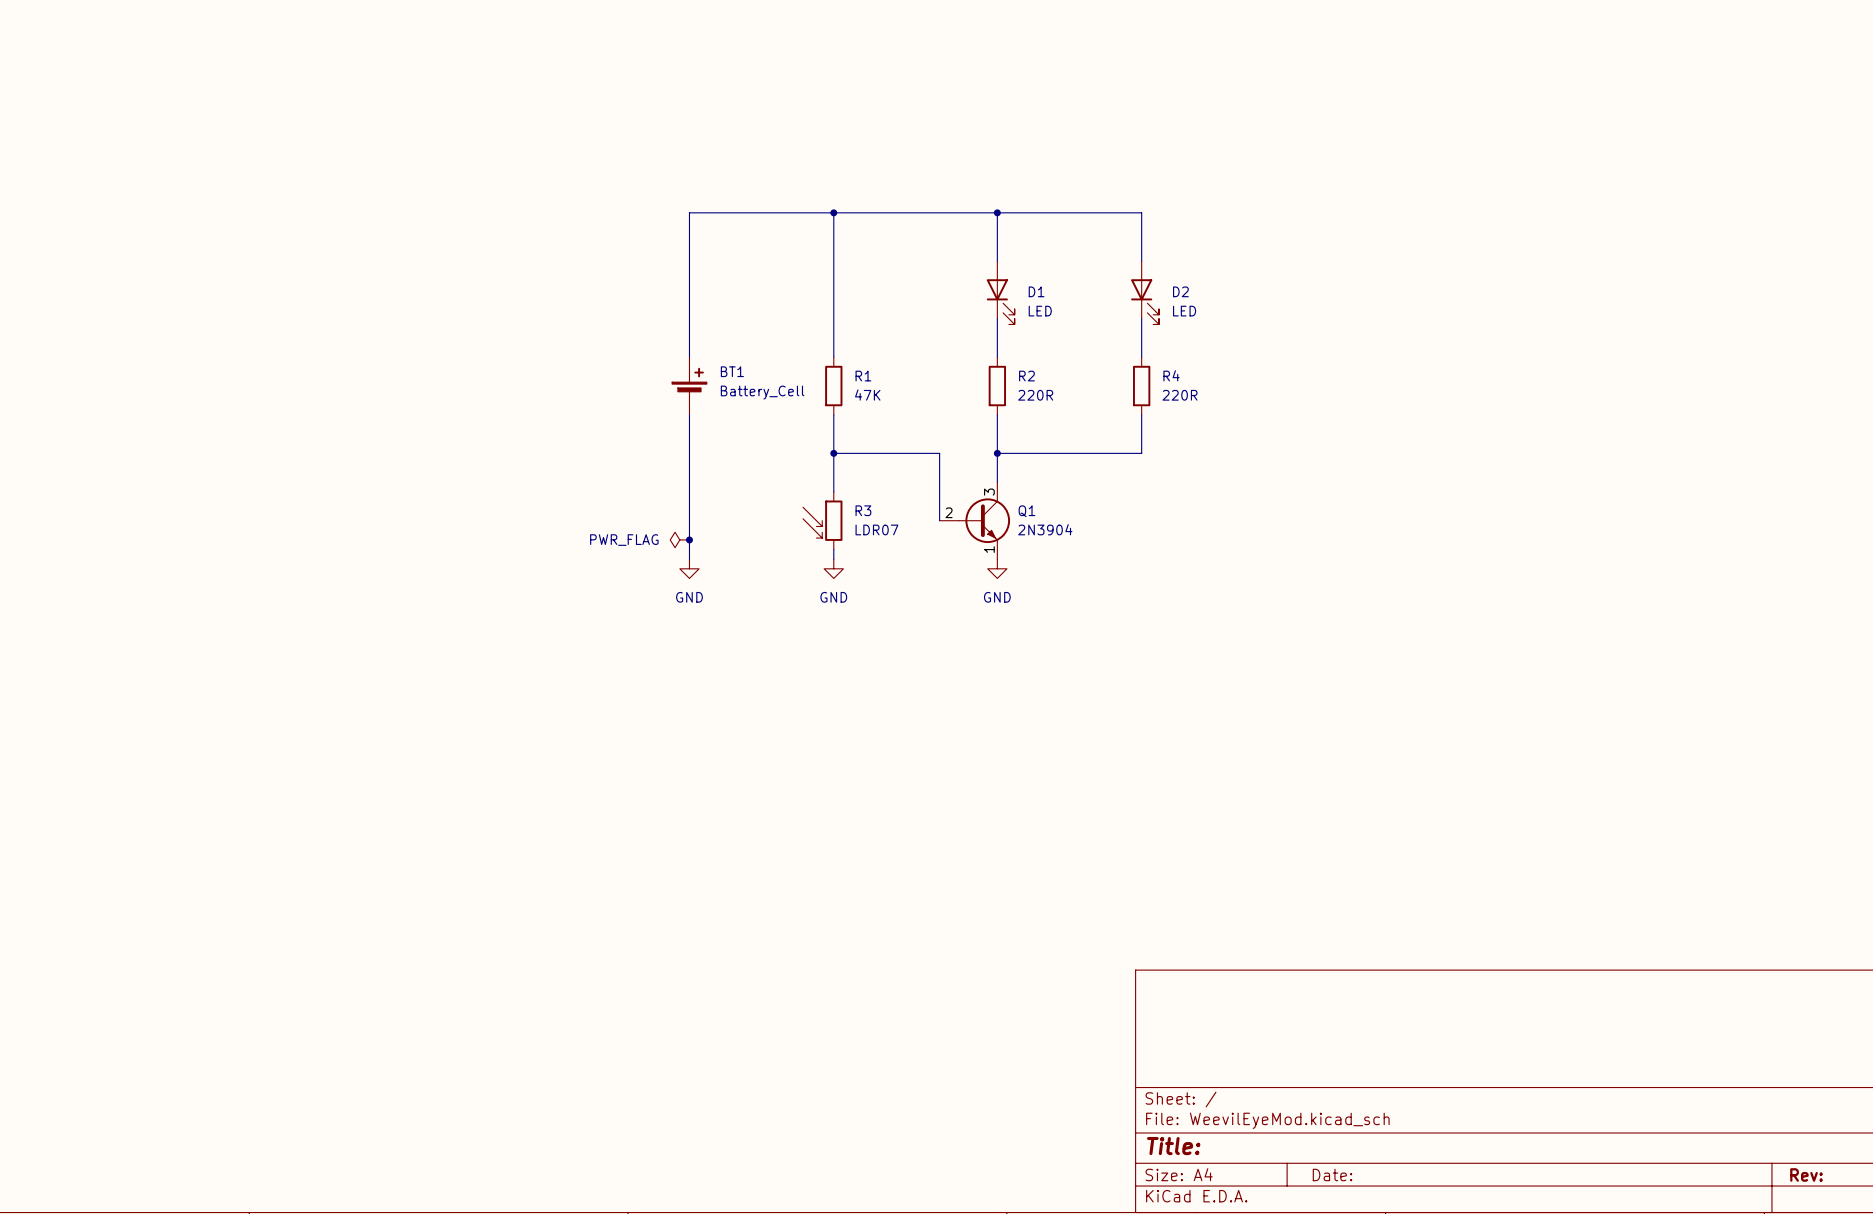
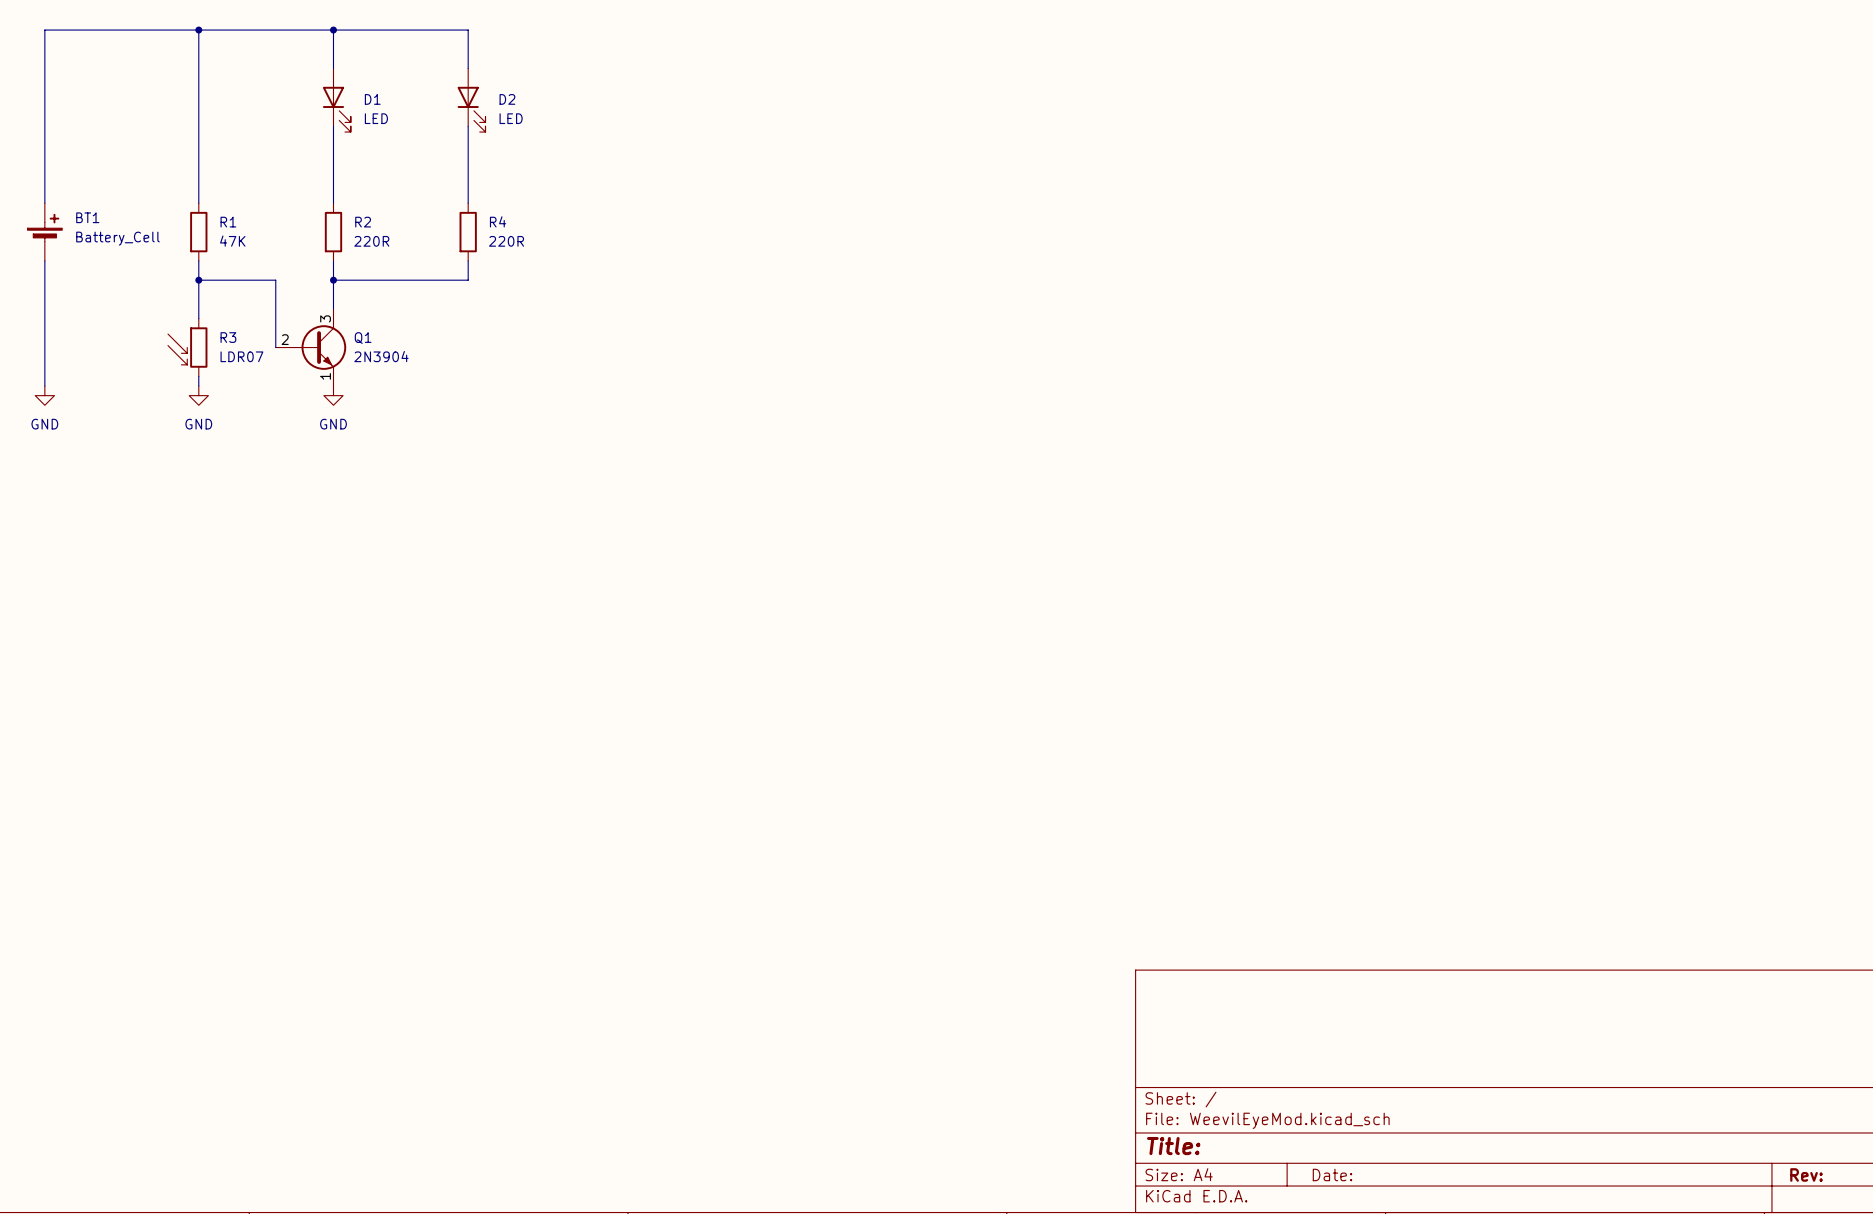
wire: none -> (198, 30) (198, 203)
junction: none -> (198, 30)
wire: none -> (333, 30) (333, 68)
junction: none -> (333, 30)
wire: none -> (468, 68) (468, 30) (44, 30) (44, 203)
wire: none -> (333, 126) (333, 203)
wire: none -> (468, 126) (468, 203)
wire: (833, 212) (833, 357) -> none
junction: (833, 212) -> none
wire: (997, 212) (997, 260) -> none
junction: (997, 212) -> none
wire: none -> (44, 260) (44, 386)
wire: none -> (198, 260) (198, 318)
wire: none -> (333, 260) (333, 309)
wire: none -> (468, 260) (468, 280) (333, 280)
wire: (1141, 260) (1141, 212) (689, 212) (689, 357) -> none
wire: none -> (198, 280) (275, 280) (275, 347)
junction: none -> (198, 280)
junction: none -> (333, 280)
D1 position: (1000, 292) -> (336, 100)
D2 position: (1145, 292) -> (471, 100)
wire: (997, 318) (997, 357) -> none
wire: (1141, 318) (1141, 357) -> none
wire: none -> (198, 376) (198, 386)
BT1 position: (689, 386) -> (44, 232)
R1 position: (833, 386) -> (198, 232)
R2 position: (997, 386) -> (333, 232)
R4 position: (1141, 386) -> (468, 232)
power symbol: none -> GND (44, 395)
power symbol: none -> GND (198, 395)
power symbol: none -> GND (333, 395)
wire: (689, 414) (689, 559) -> none
wire: (833, 414) (833, 491) -> none
wire: (997, 414) (997, 482) -> none
wire: (1141, 414) (1141, 453) (997, 453) -> none
wire: (833, 453) (939, 453) (939, 520) -> none
junction: (833, 453) -> none
junction: (997, 453) -> none
R3 position: (822, 520) -> (187, 347)
Q1 position: (974, 520) -> (310, 347)
power symbol: PWR_FLAG (679, 539) -> none
junction: (689, 539) -> none
wire: (833, 549) (833, 559) -> none
power symbol: GND (689, 568) -> none
power symbol: GND (833, 568) -> none
power symbol: GND (997, 568) -> none

